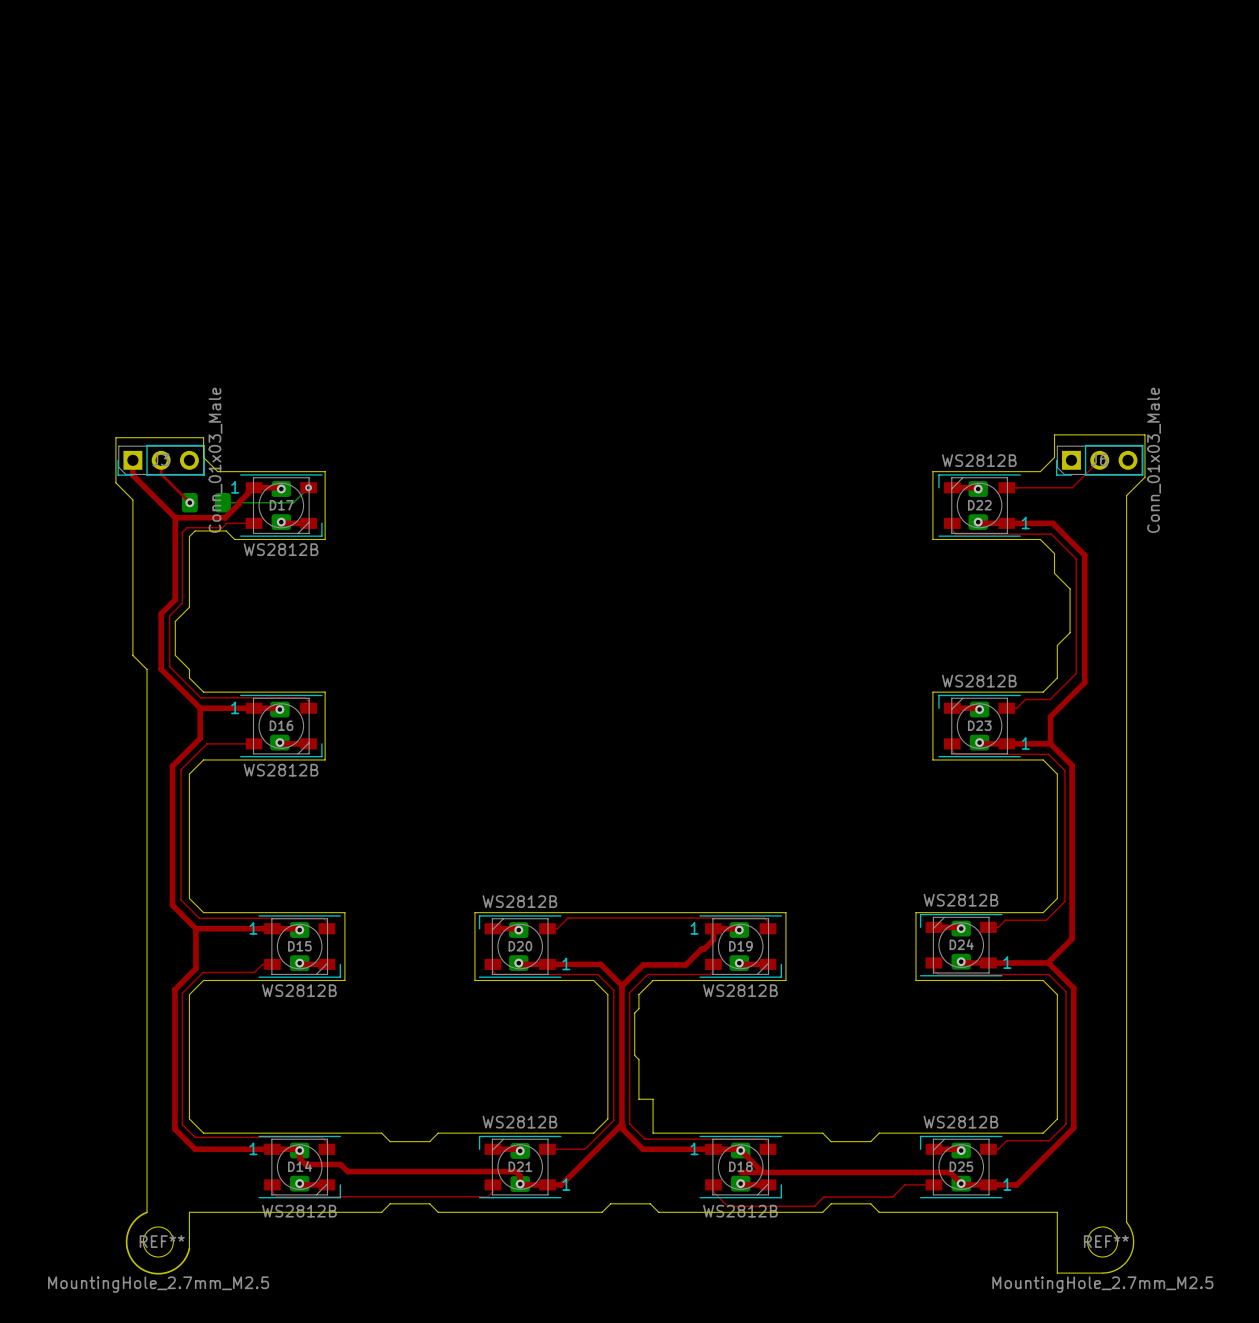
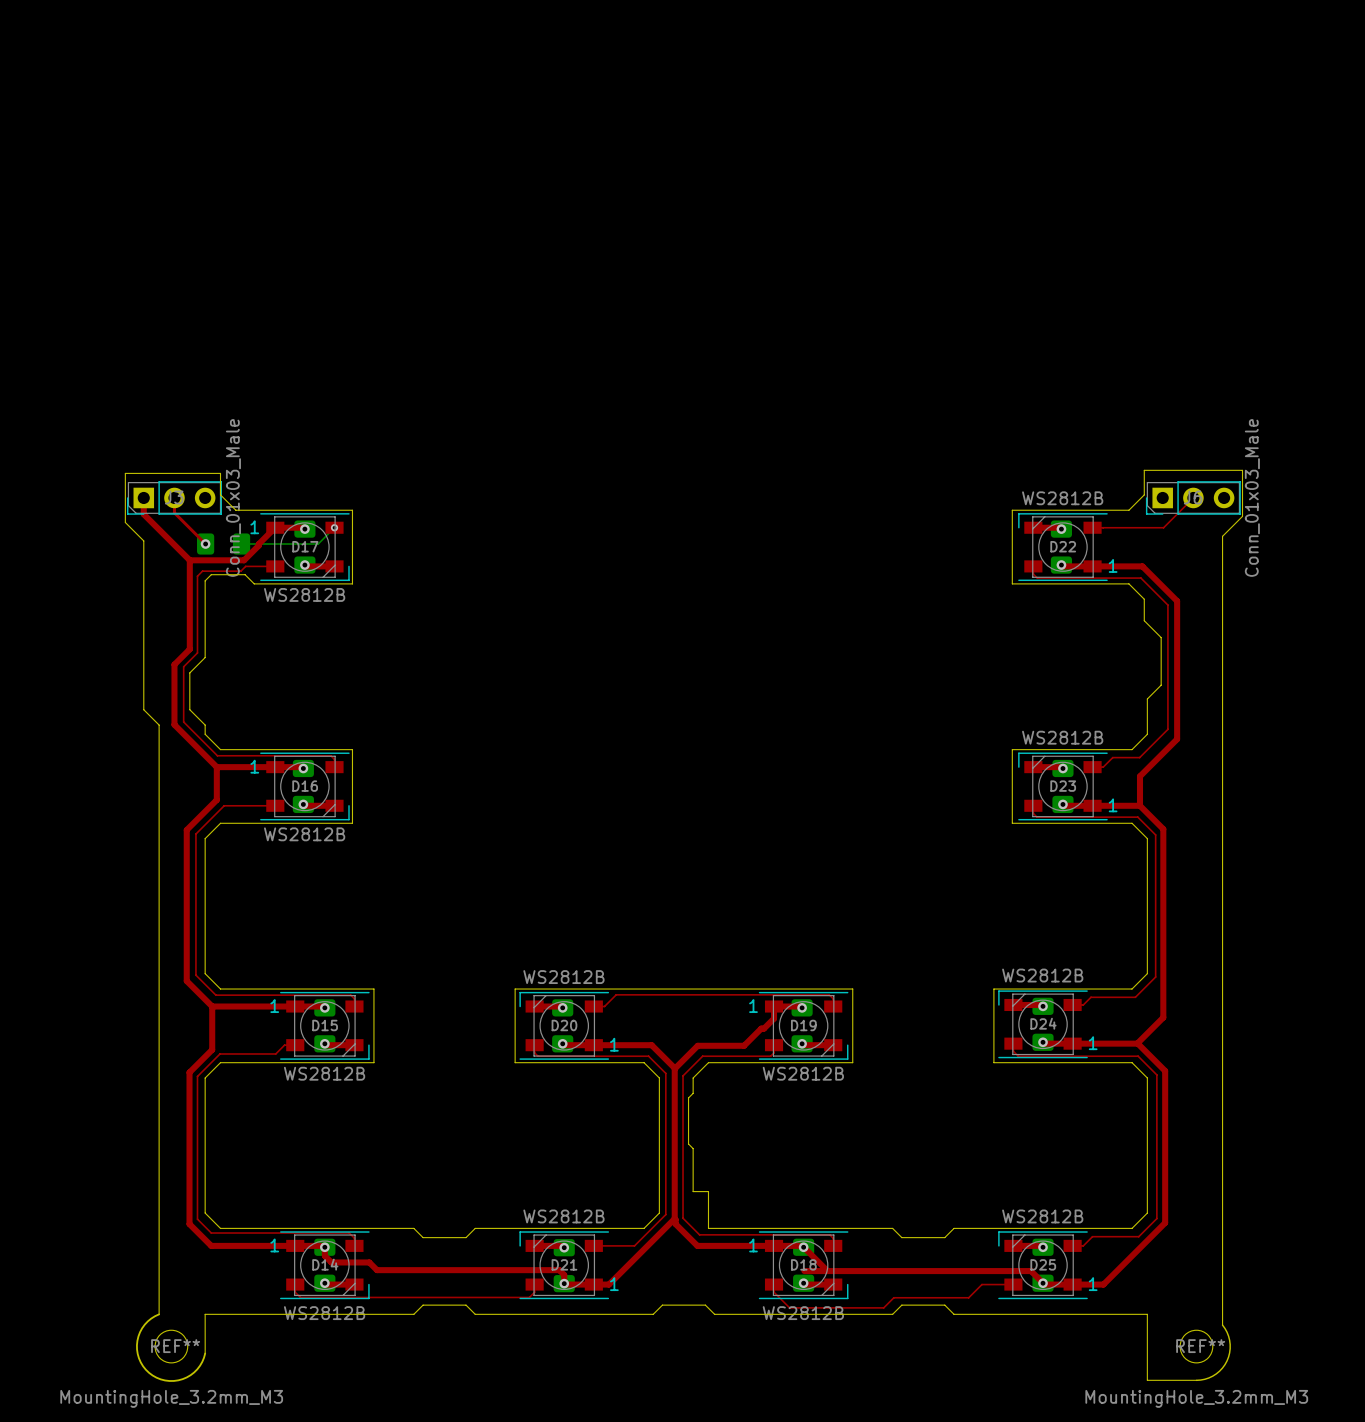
REF** value: MountingHole_2.7mm_M2.5 (158, 1284) -> MountingHole_3.2mm_M3 (171, 1398)
REF** value: MountingHole_2.7mm_M2.5 (1102, 1284) -> MountingHole_3.2mm_M3 (1196, 1398)

